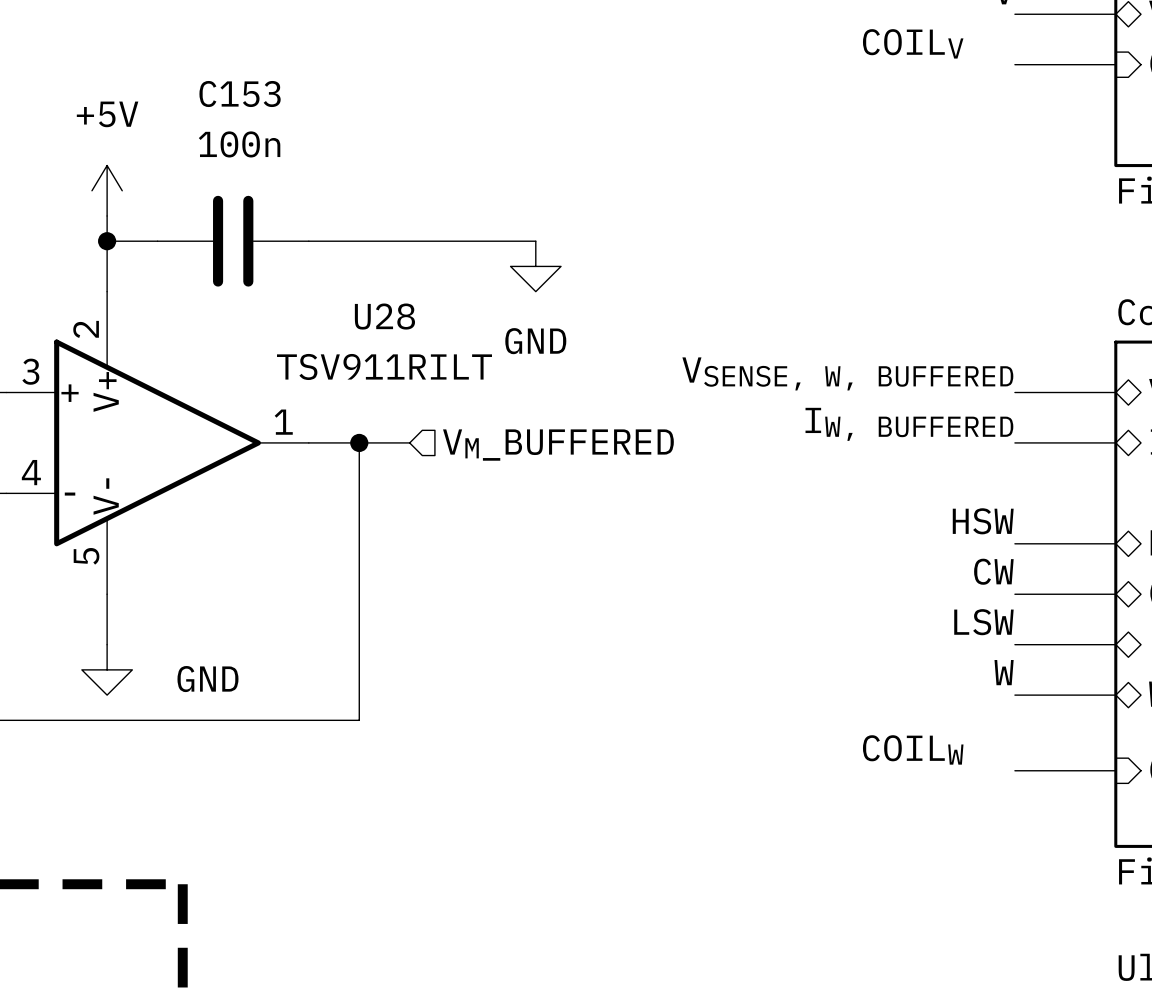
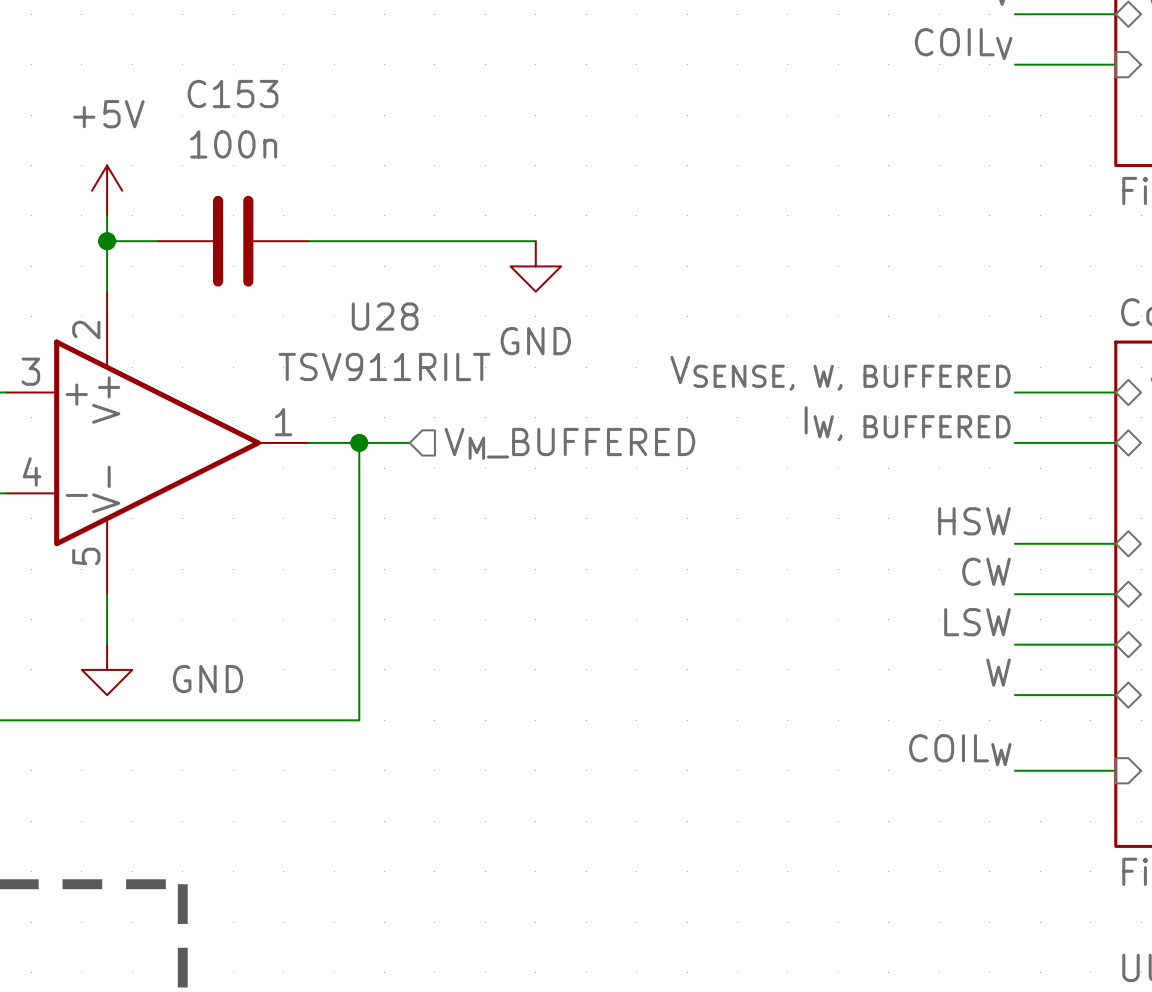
label position: COILV (913, 43) -> COILV (963, 44)
label position: COILW (913, 749) -> COILW (960, 750)

